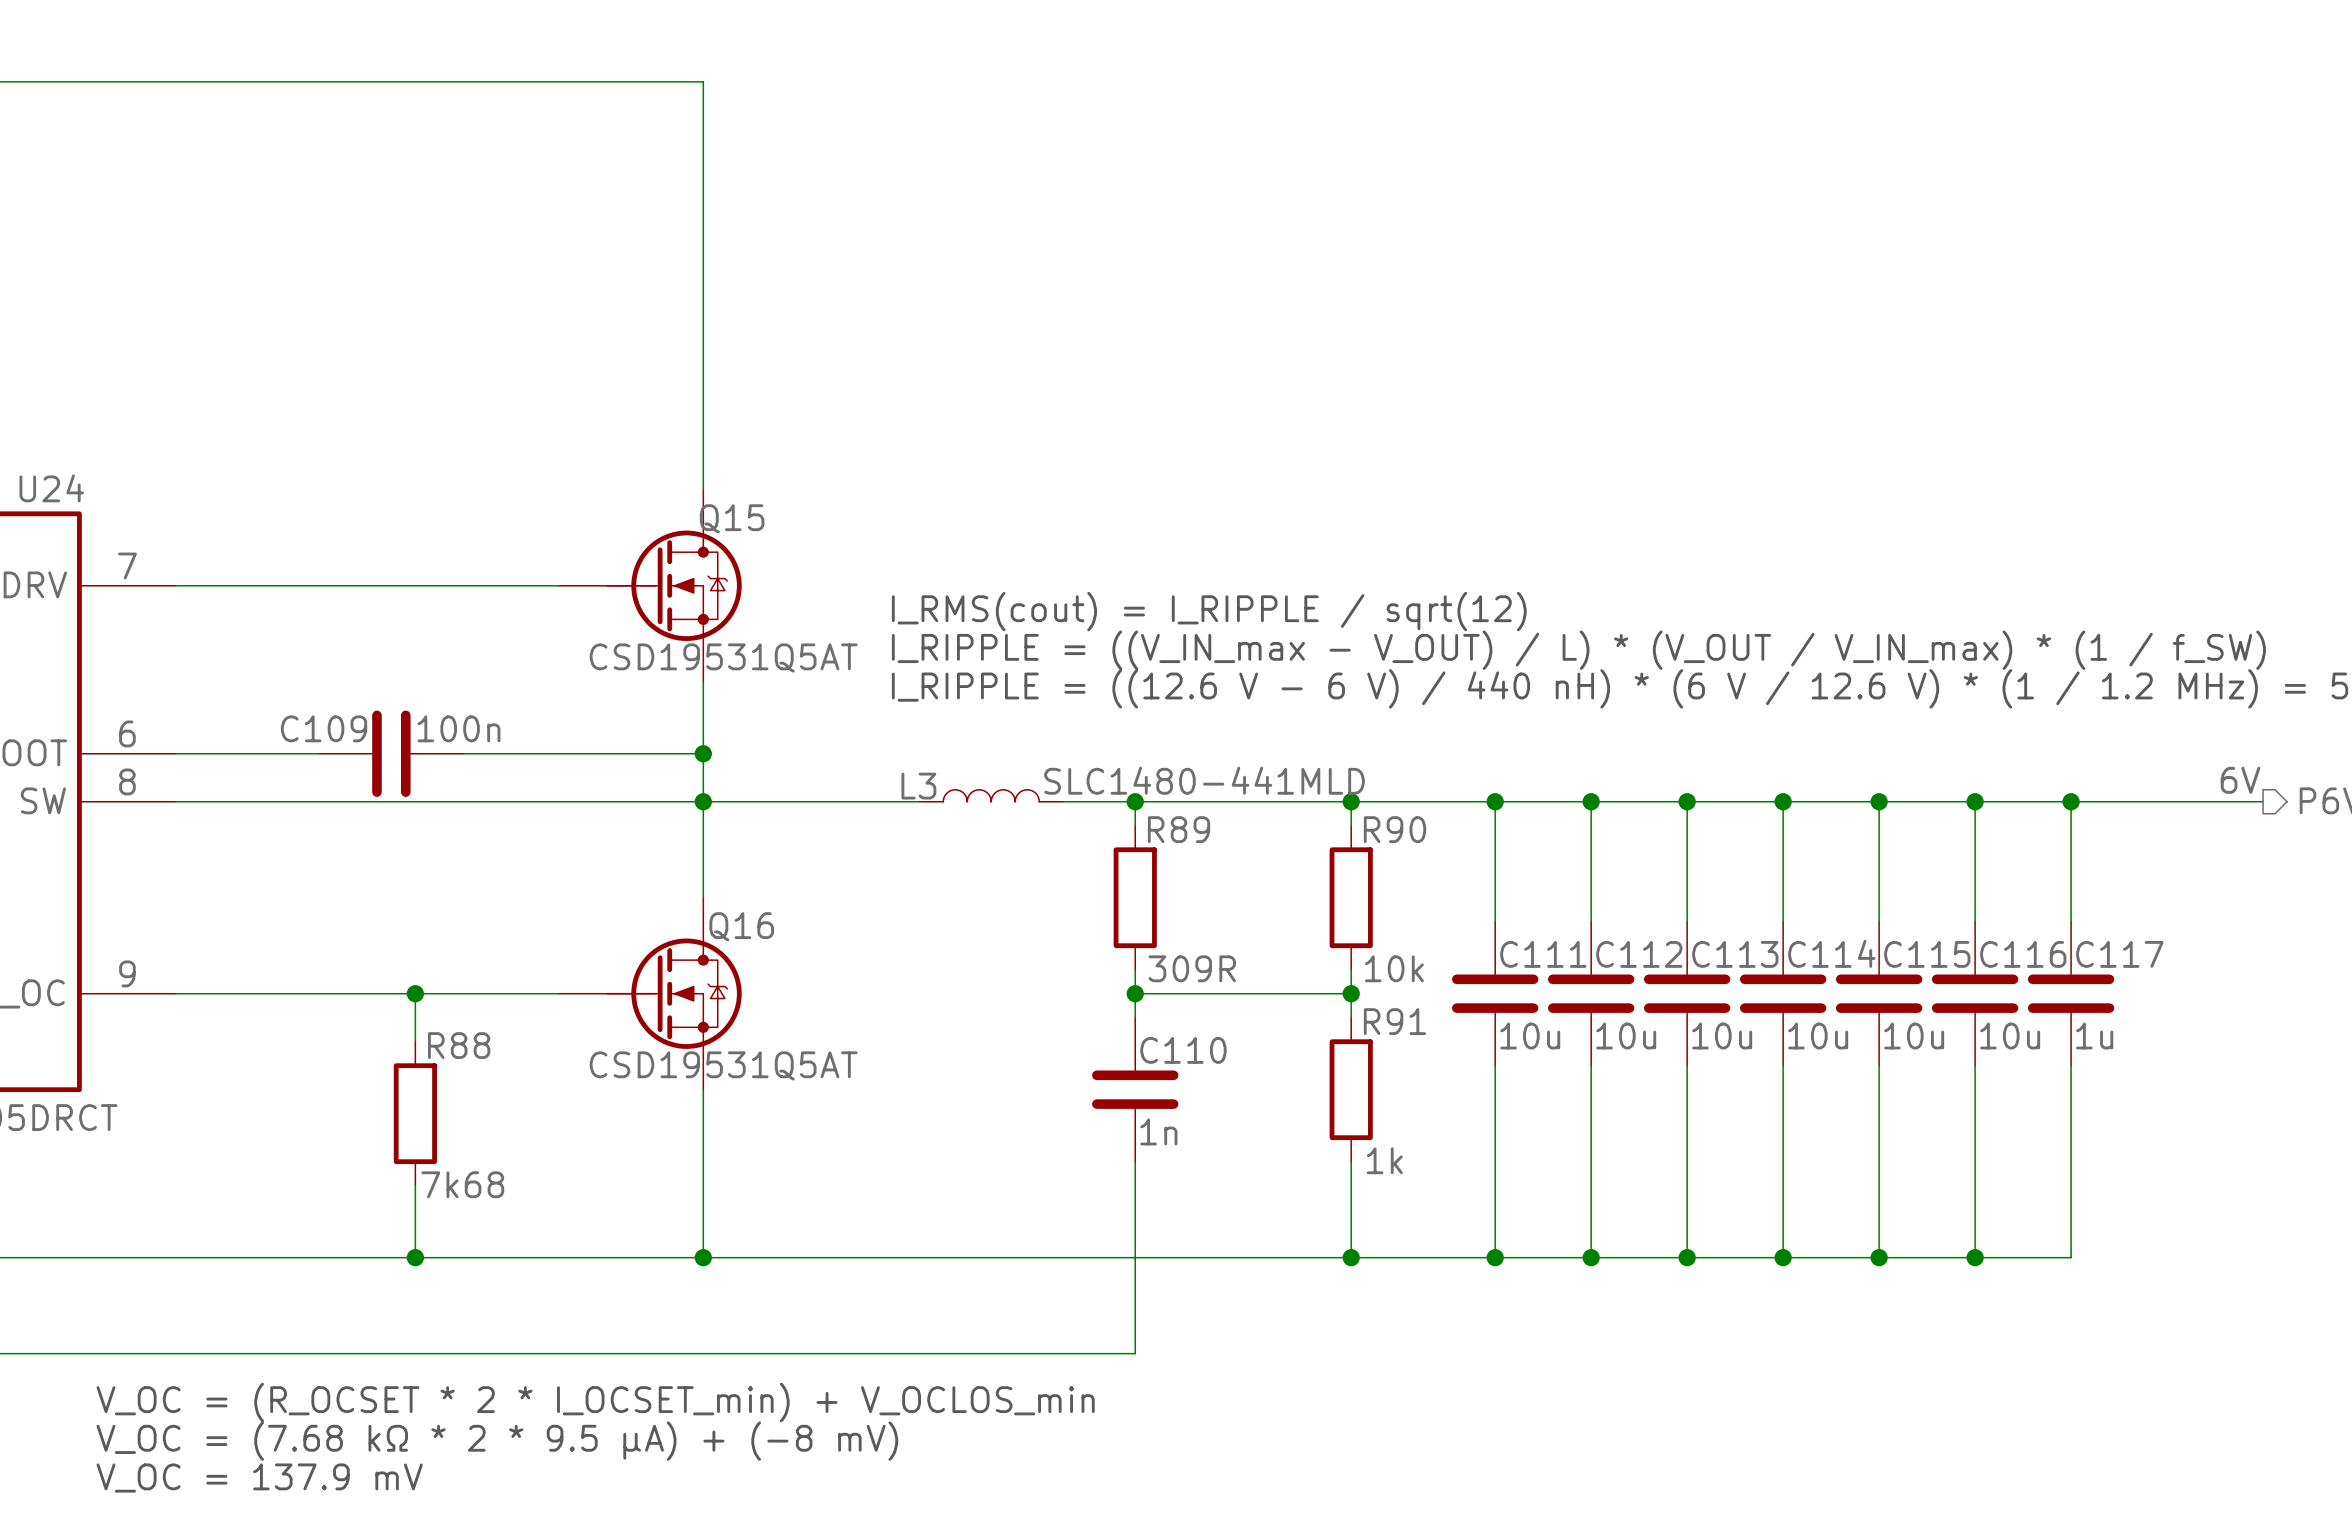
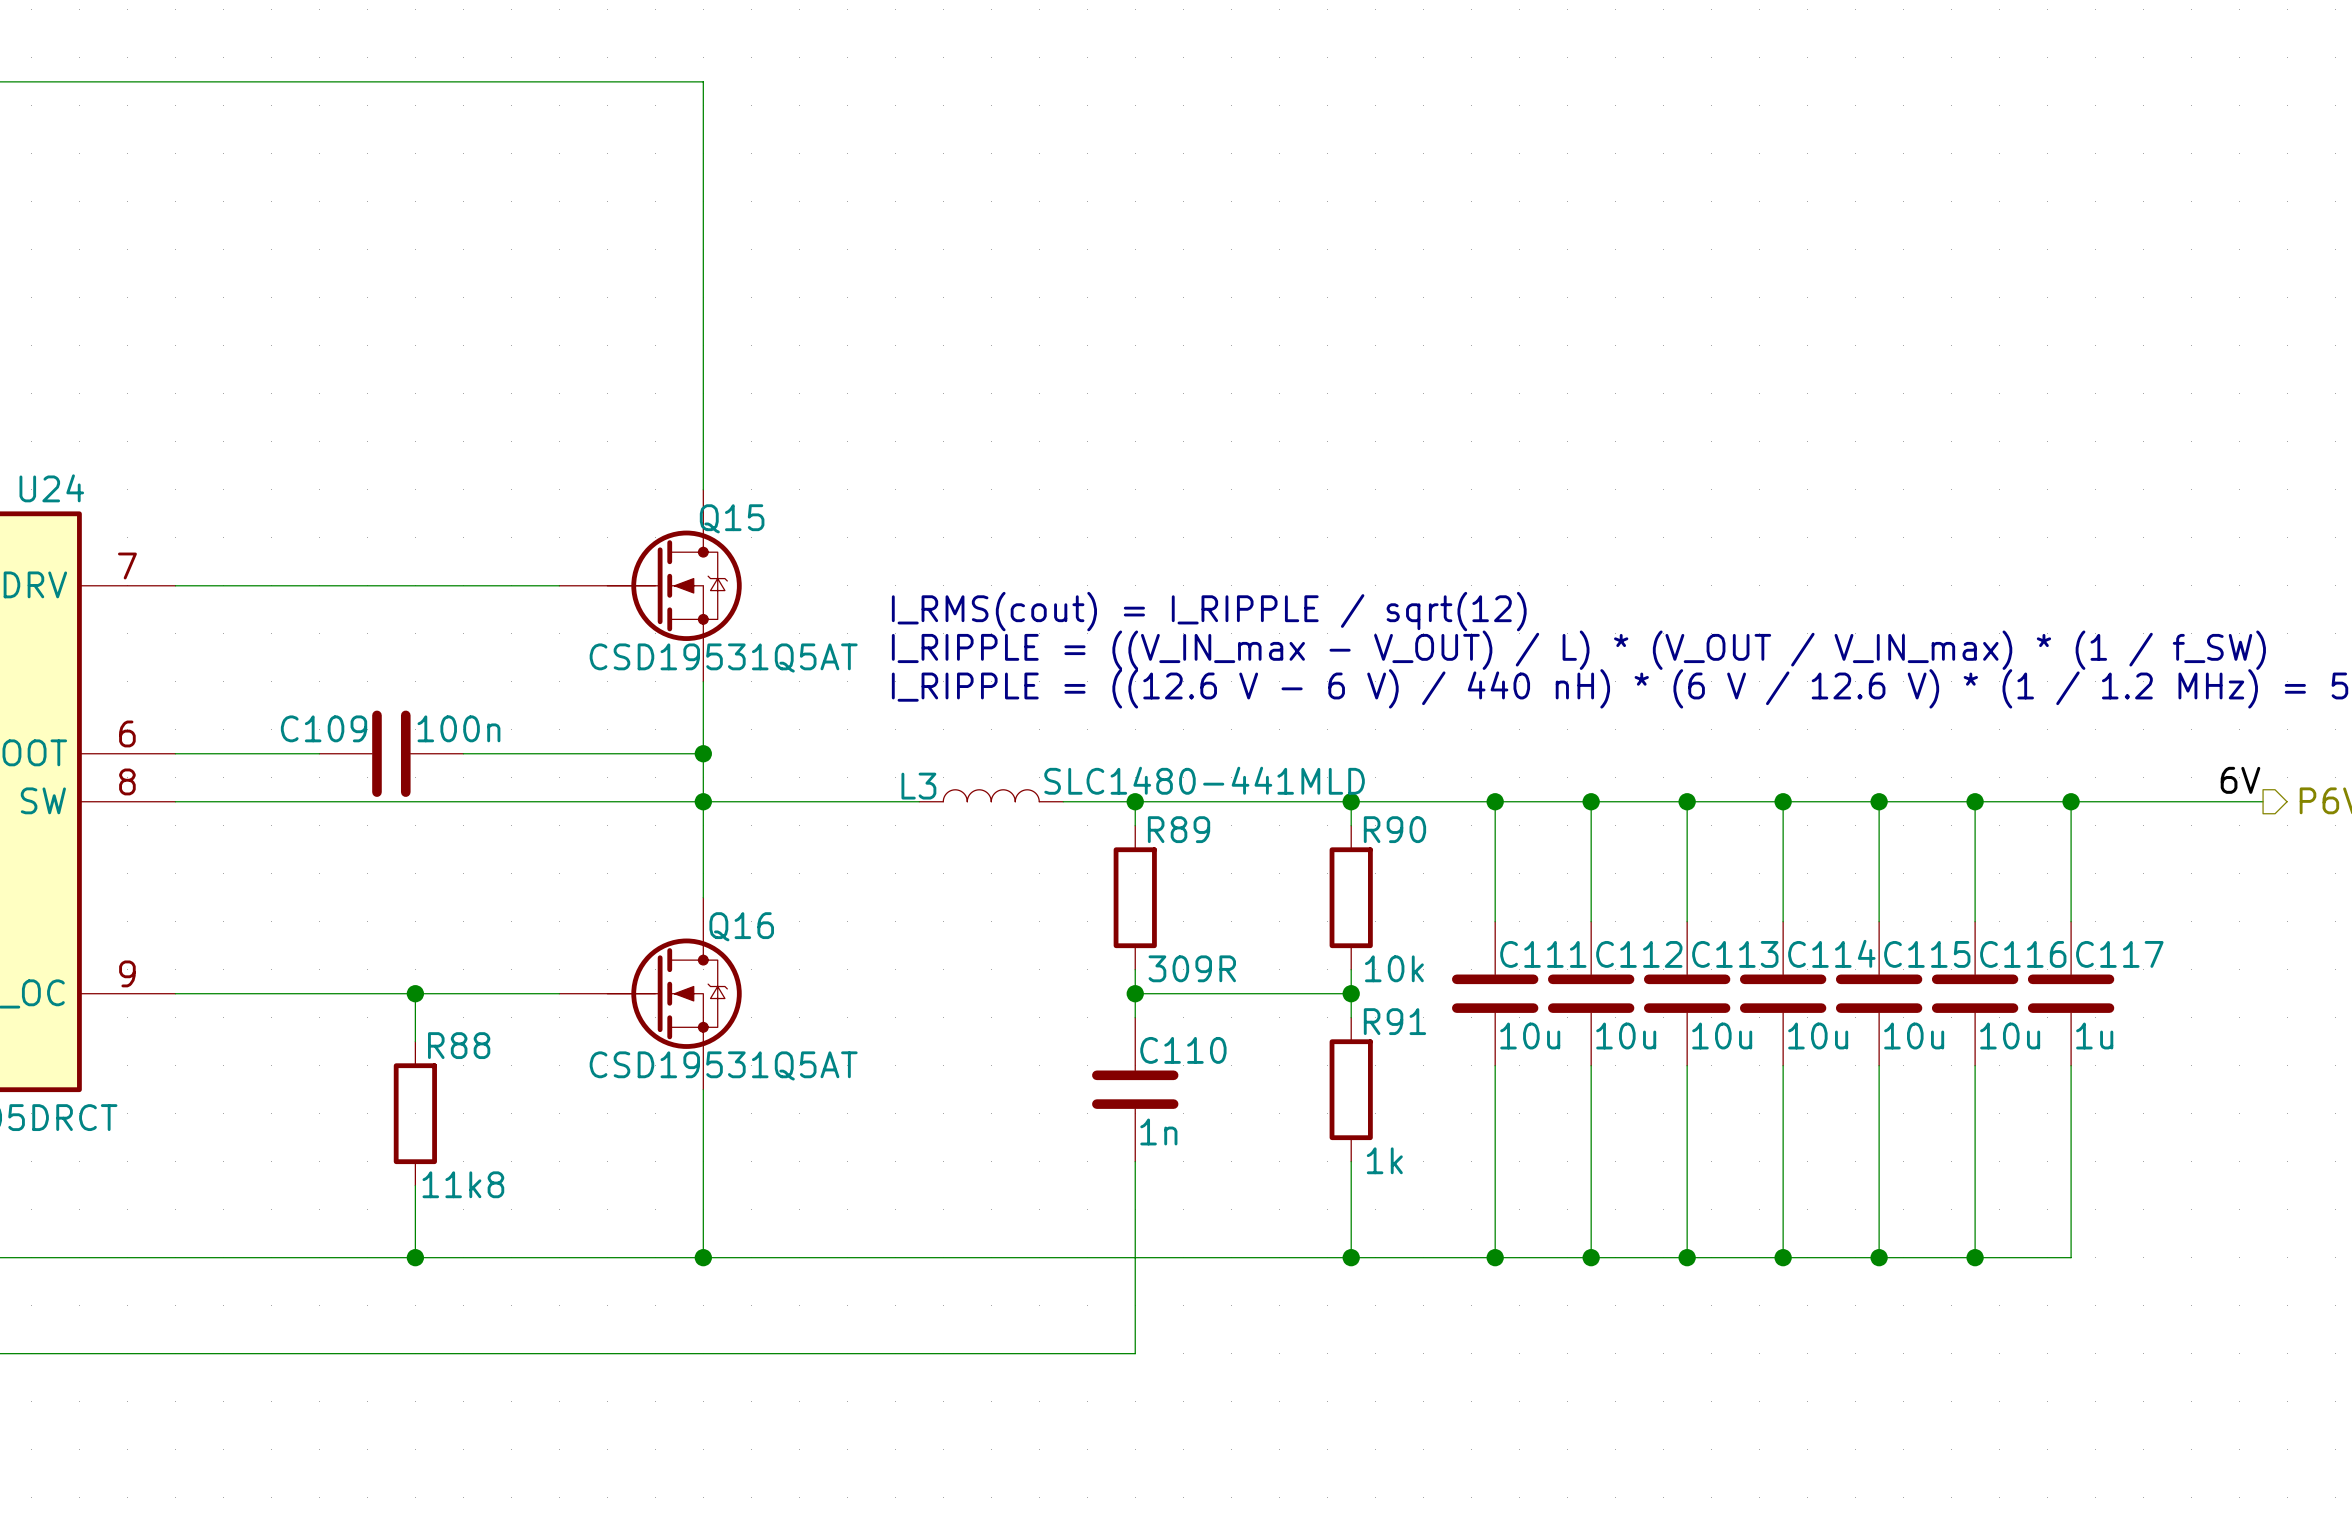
R88 value: 7k68 (462, 1184) -> 11k8 (463, 1184)
text: V_OC = (R_OCSET * 2 * I_OCSET_min) + V_OCLOS_min (595, 1402) -> none
text: V_OC = (7.68 kΩ * 2 * 9.5 µA) + (-8 mV) (497, 1441) -> none
text: V_OC = 137.9 mV (259, 1478) -> none

